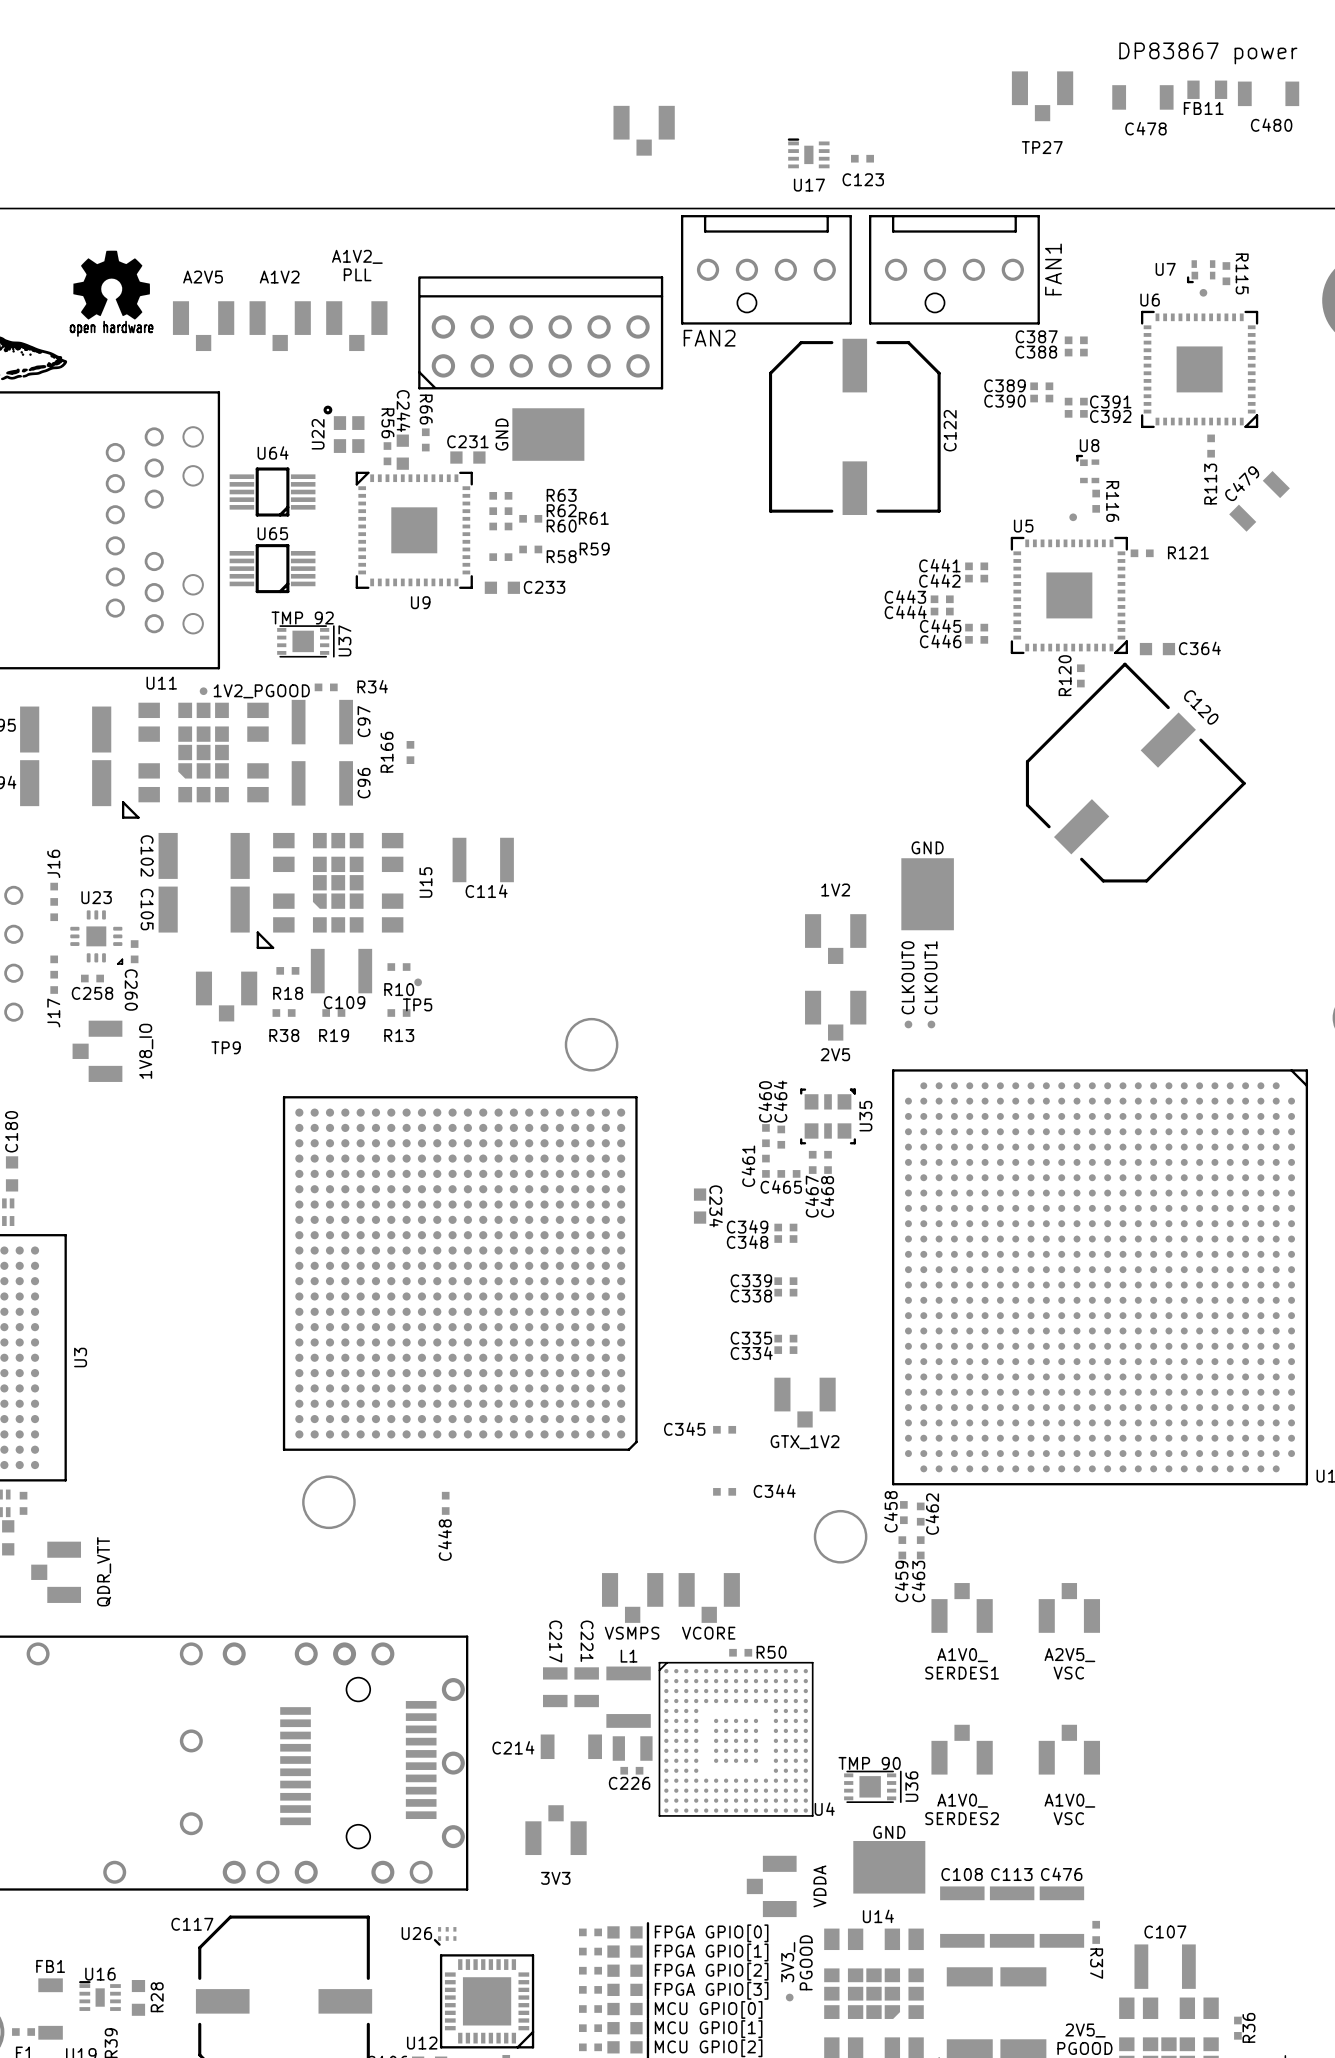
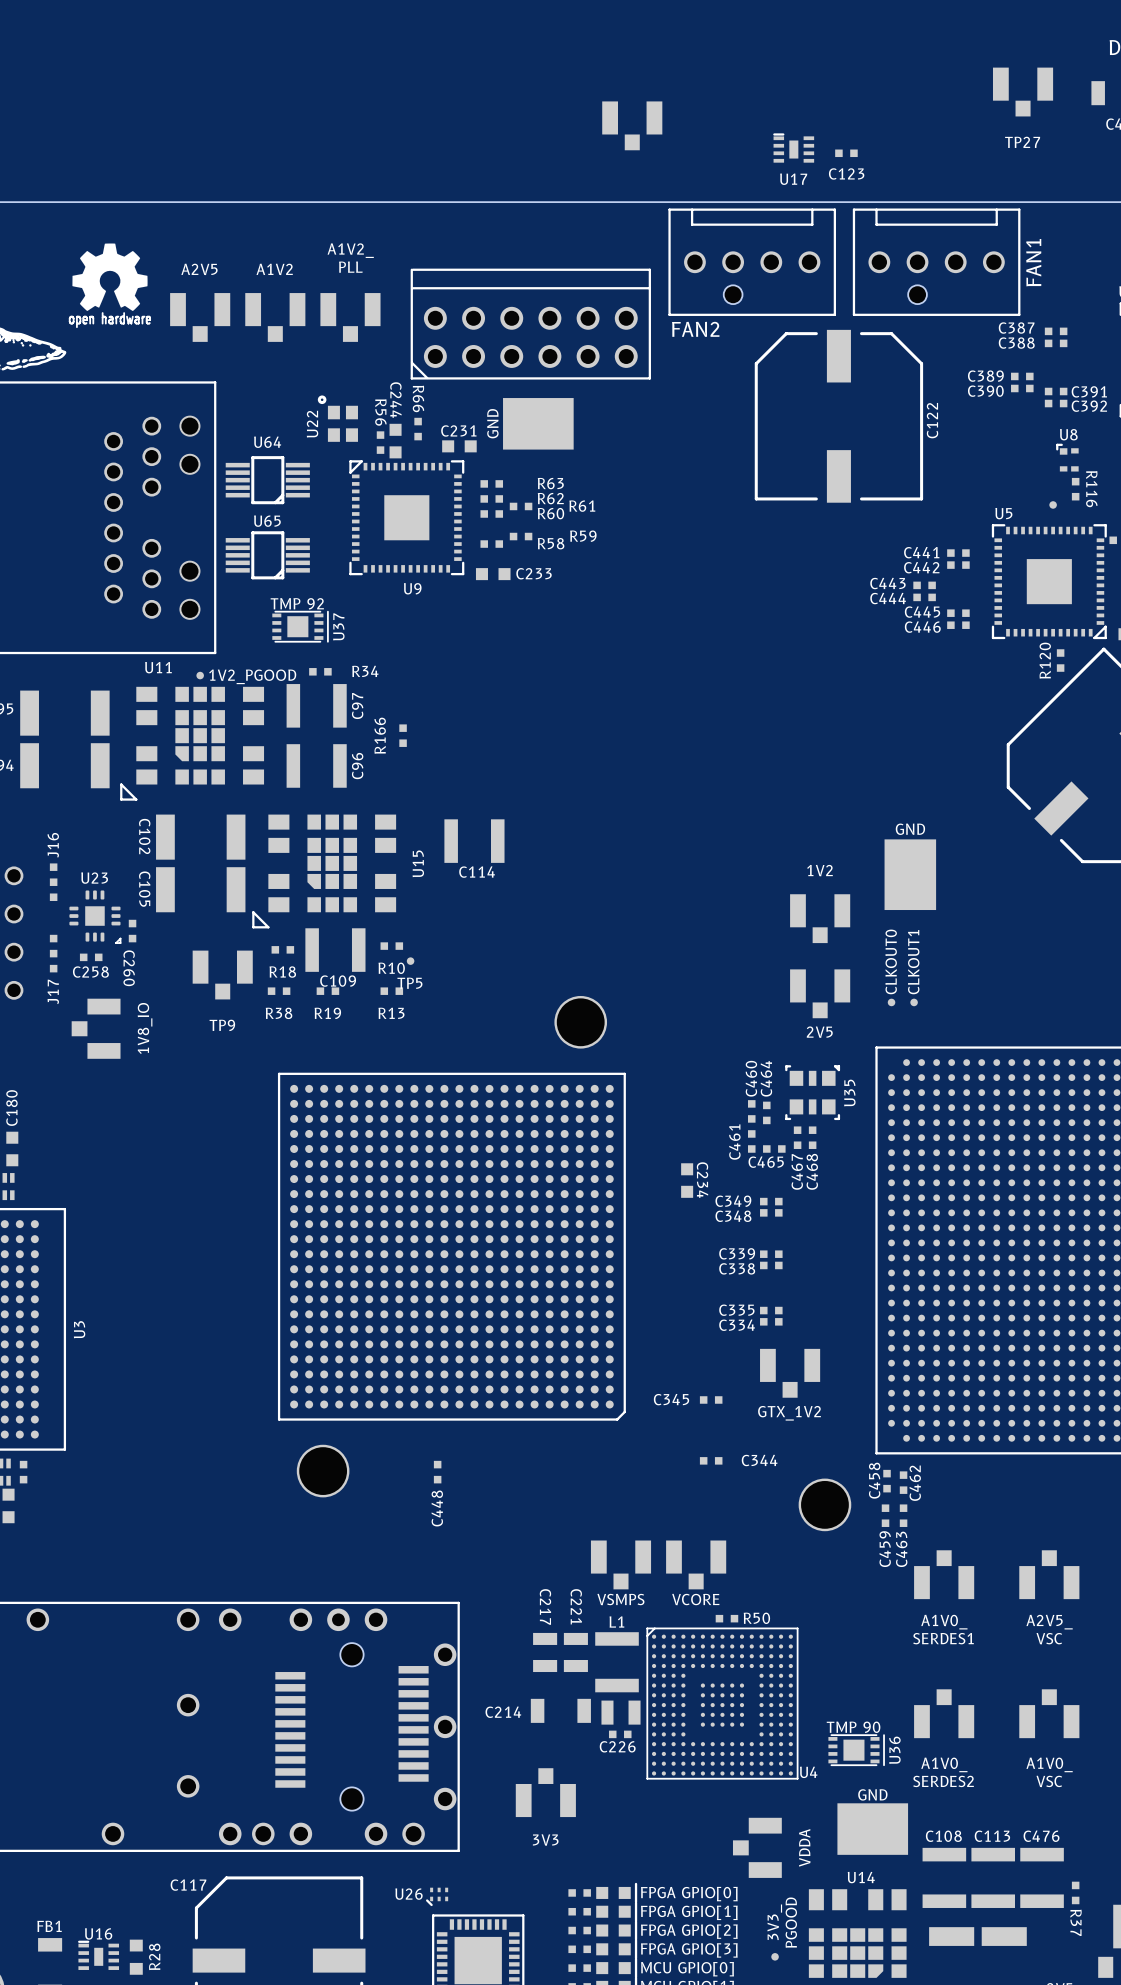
text: QDR_VTT (104, 1571) -> none
part: (56, 1572) -> none

